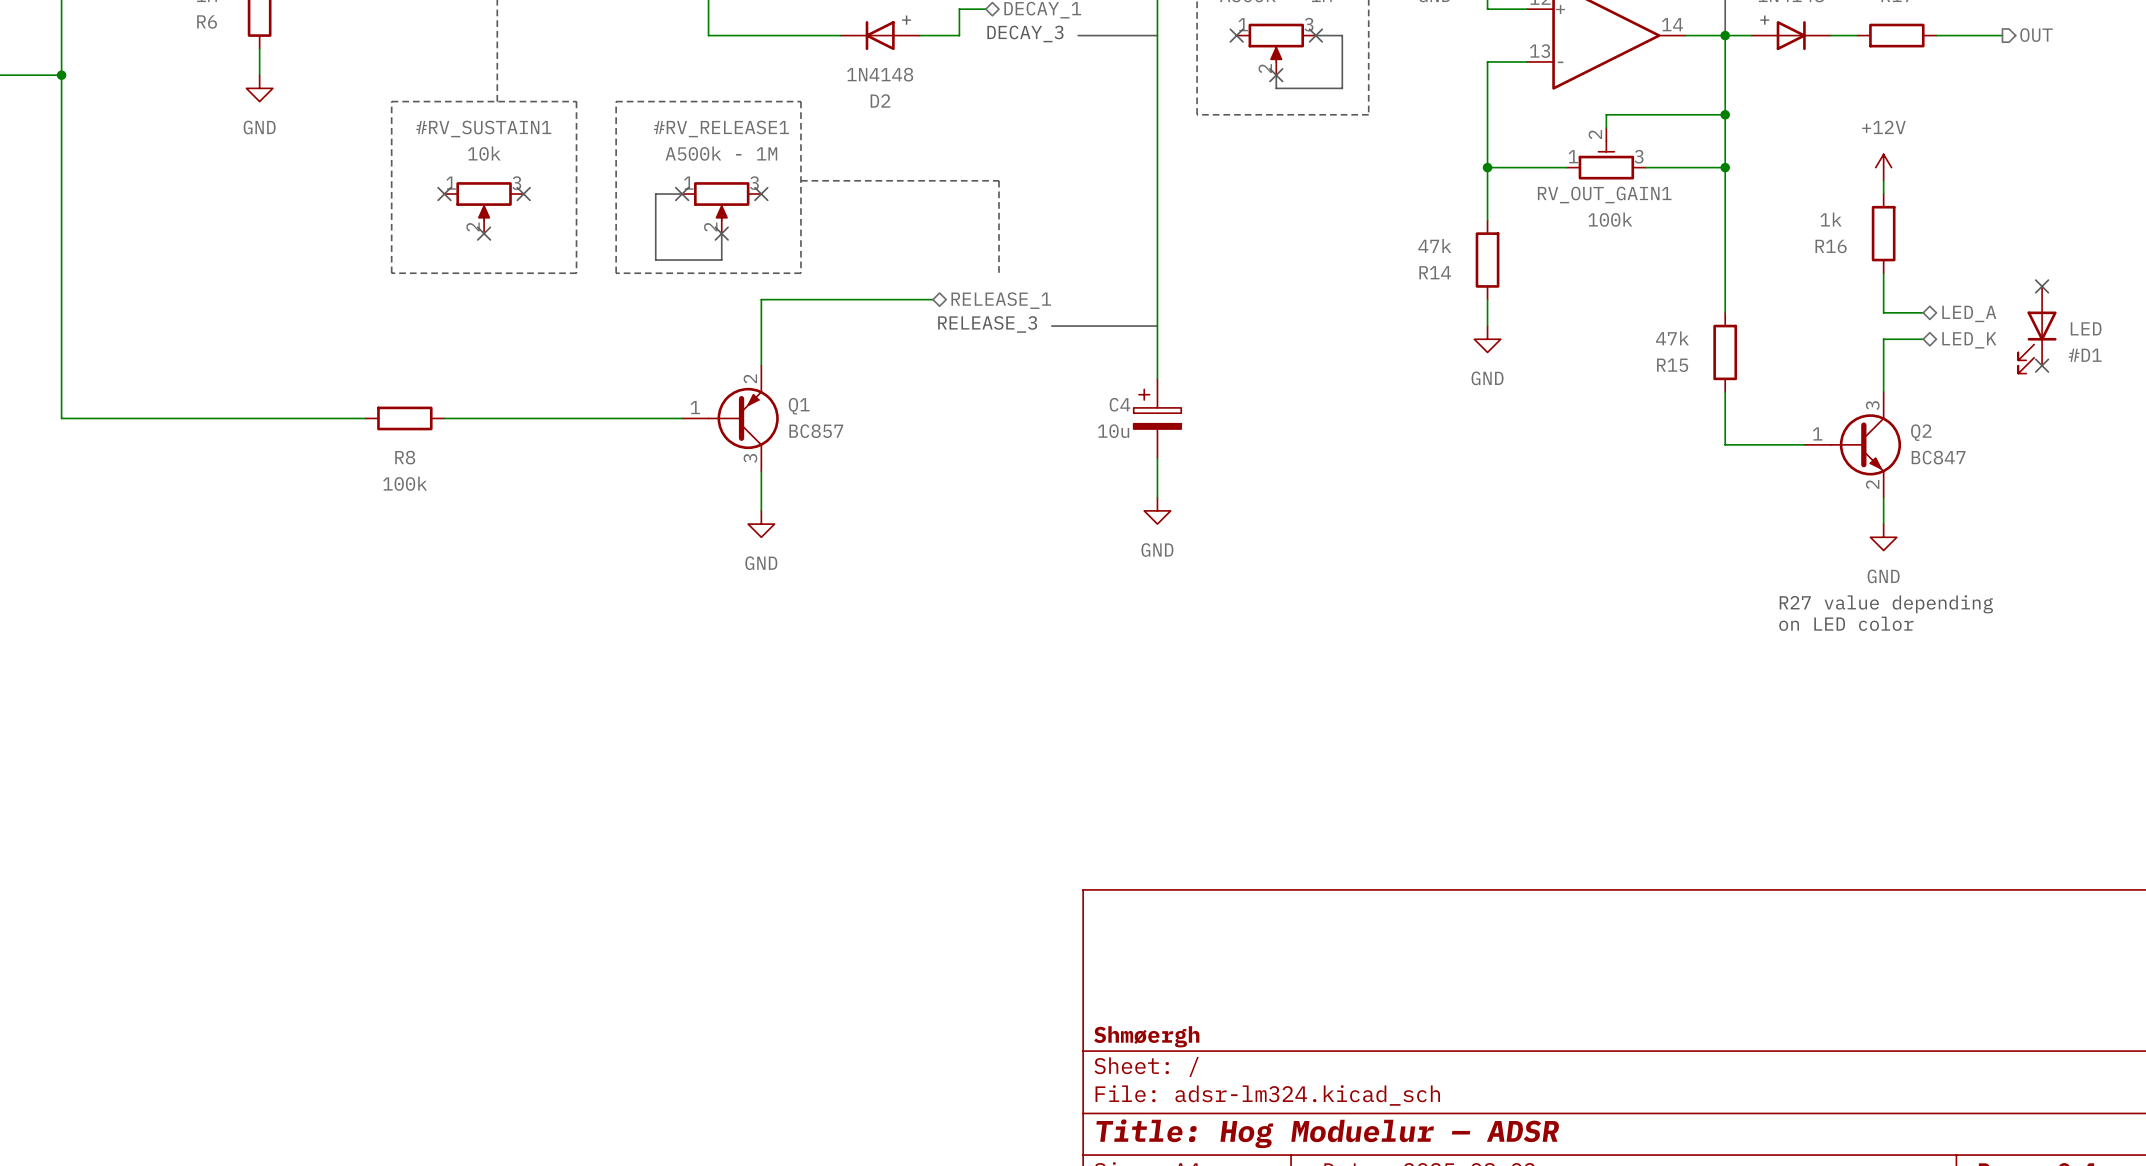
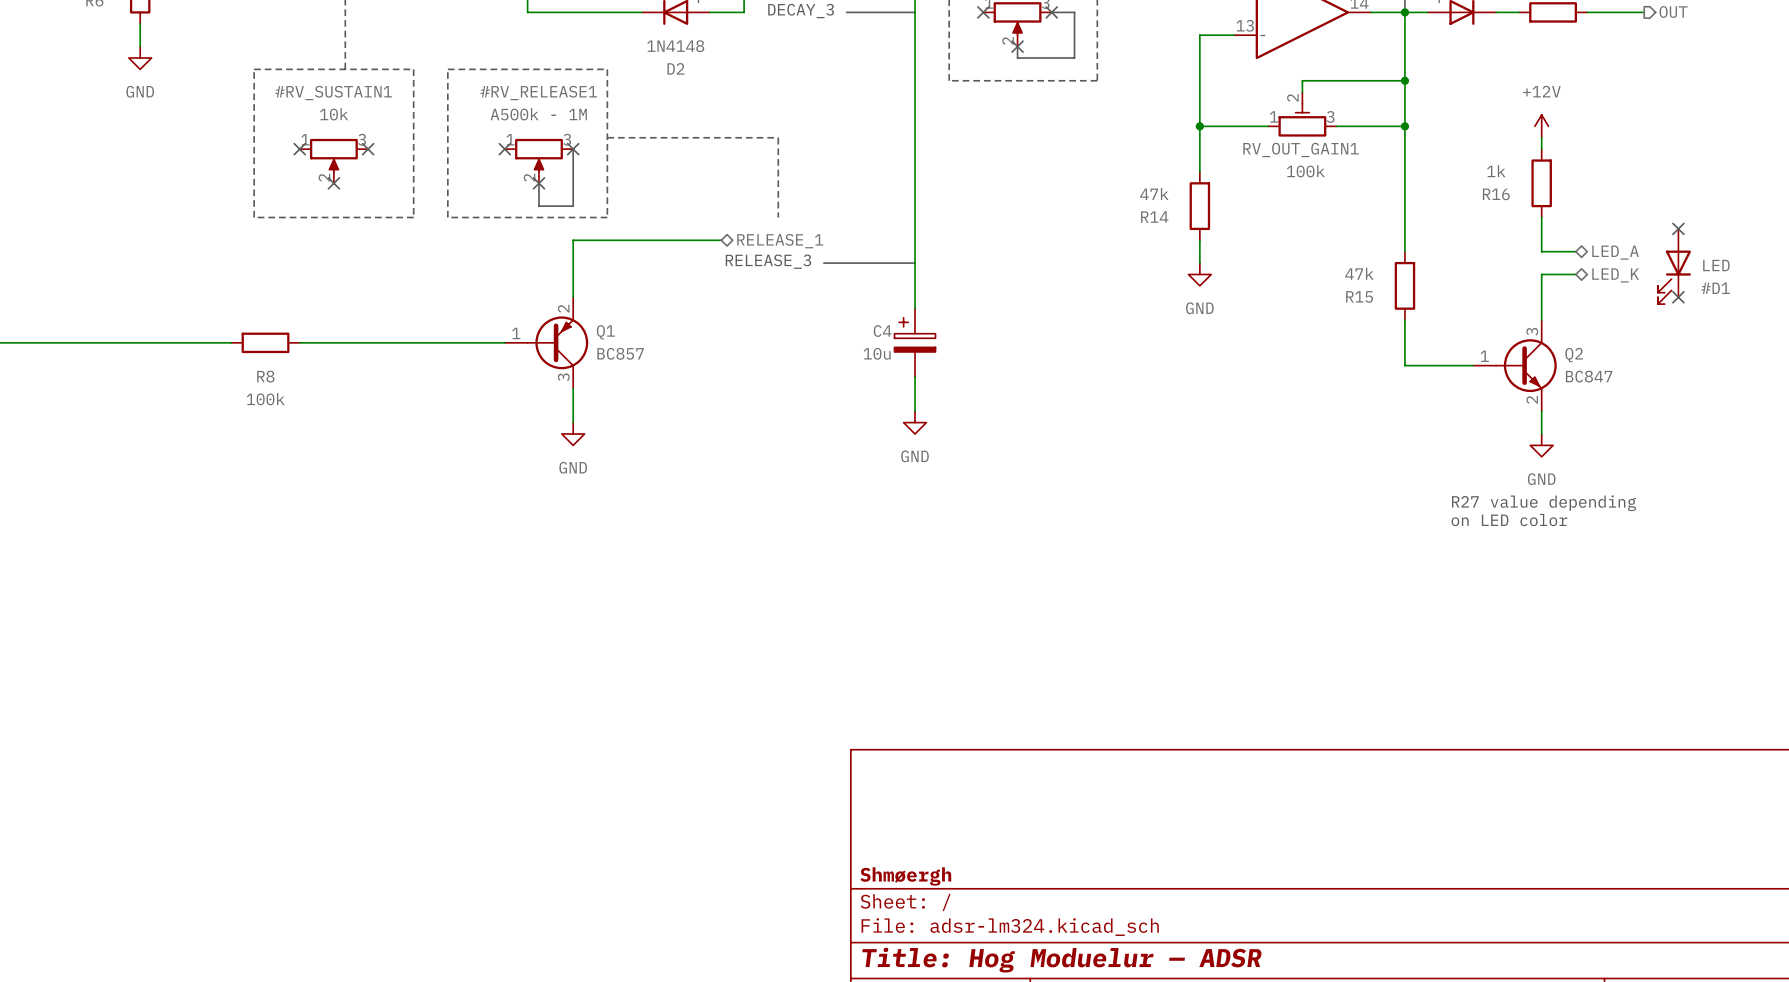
line: (682, 194) (655, 194) (655, 260) (721, 260) -> (573, 149) (573, 206) (539, 206)

